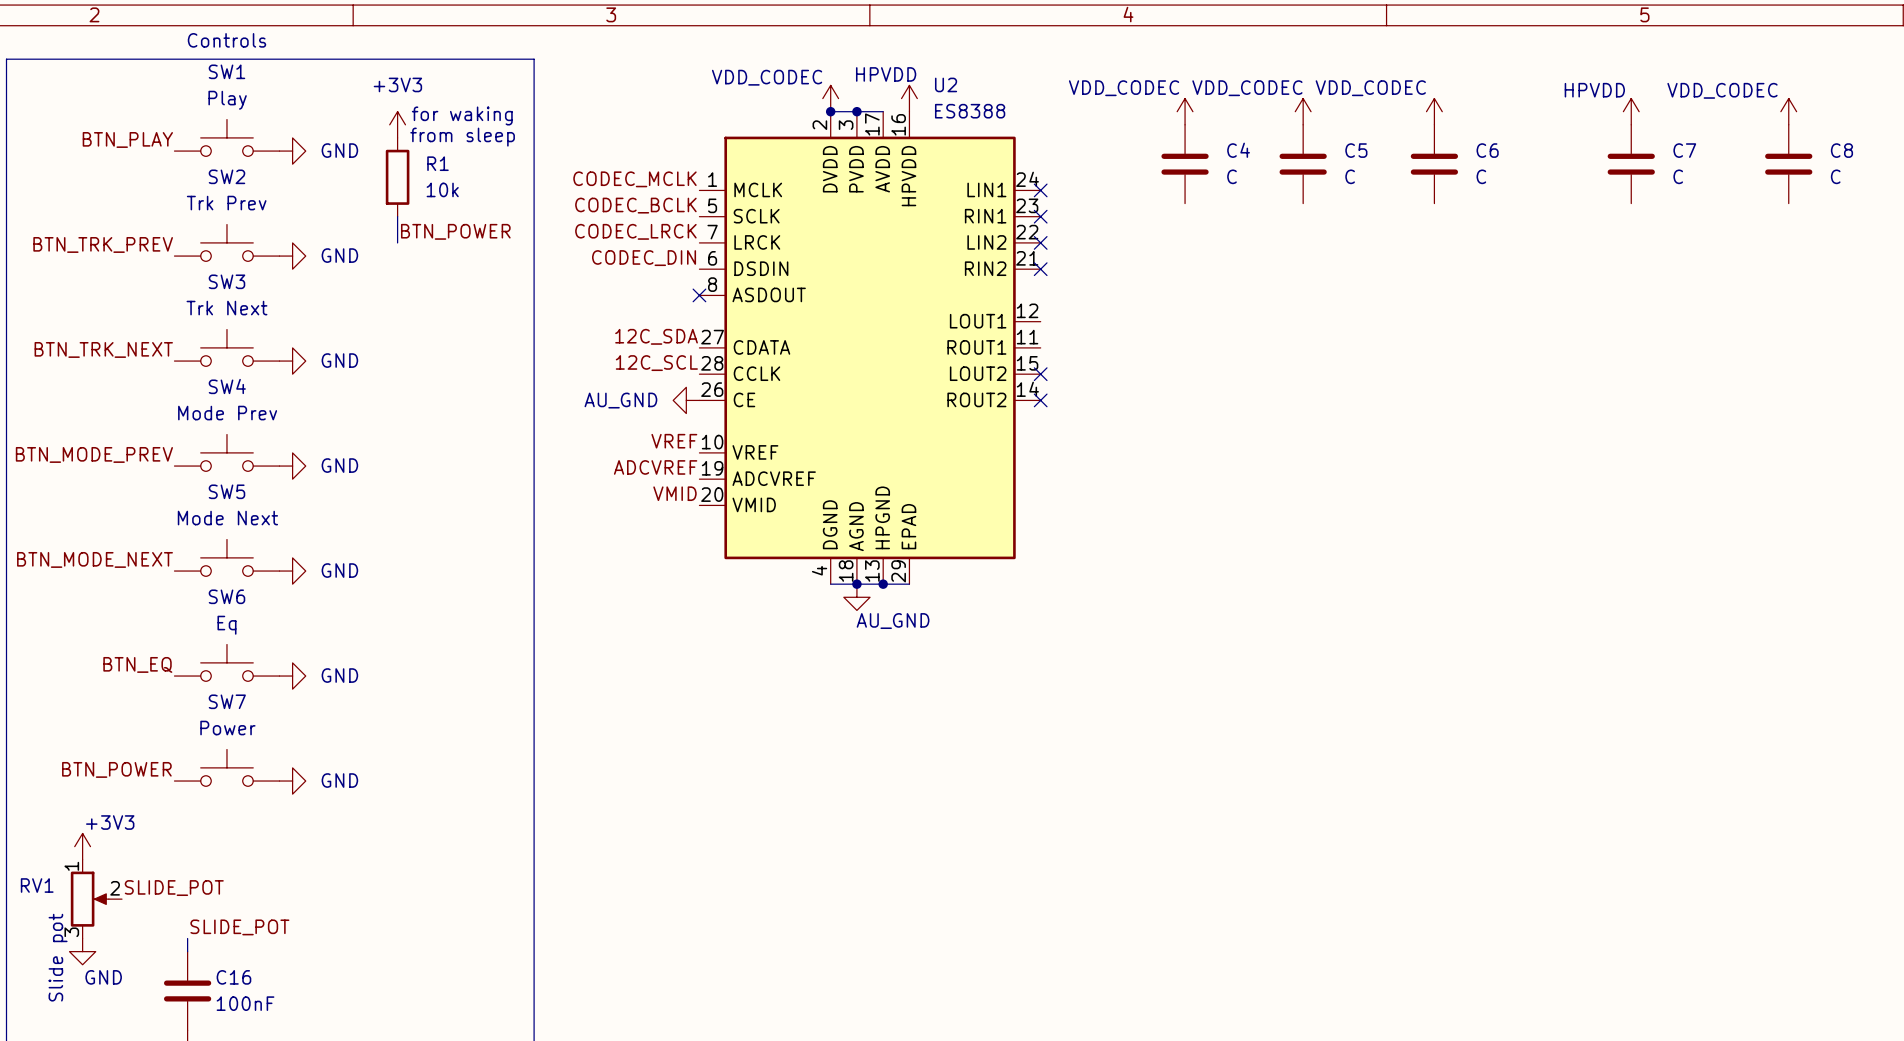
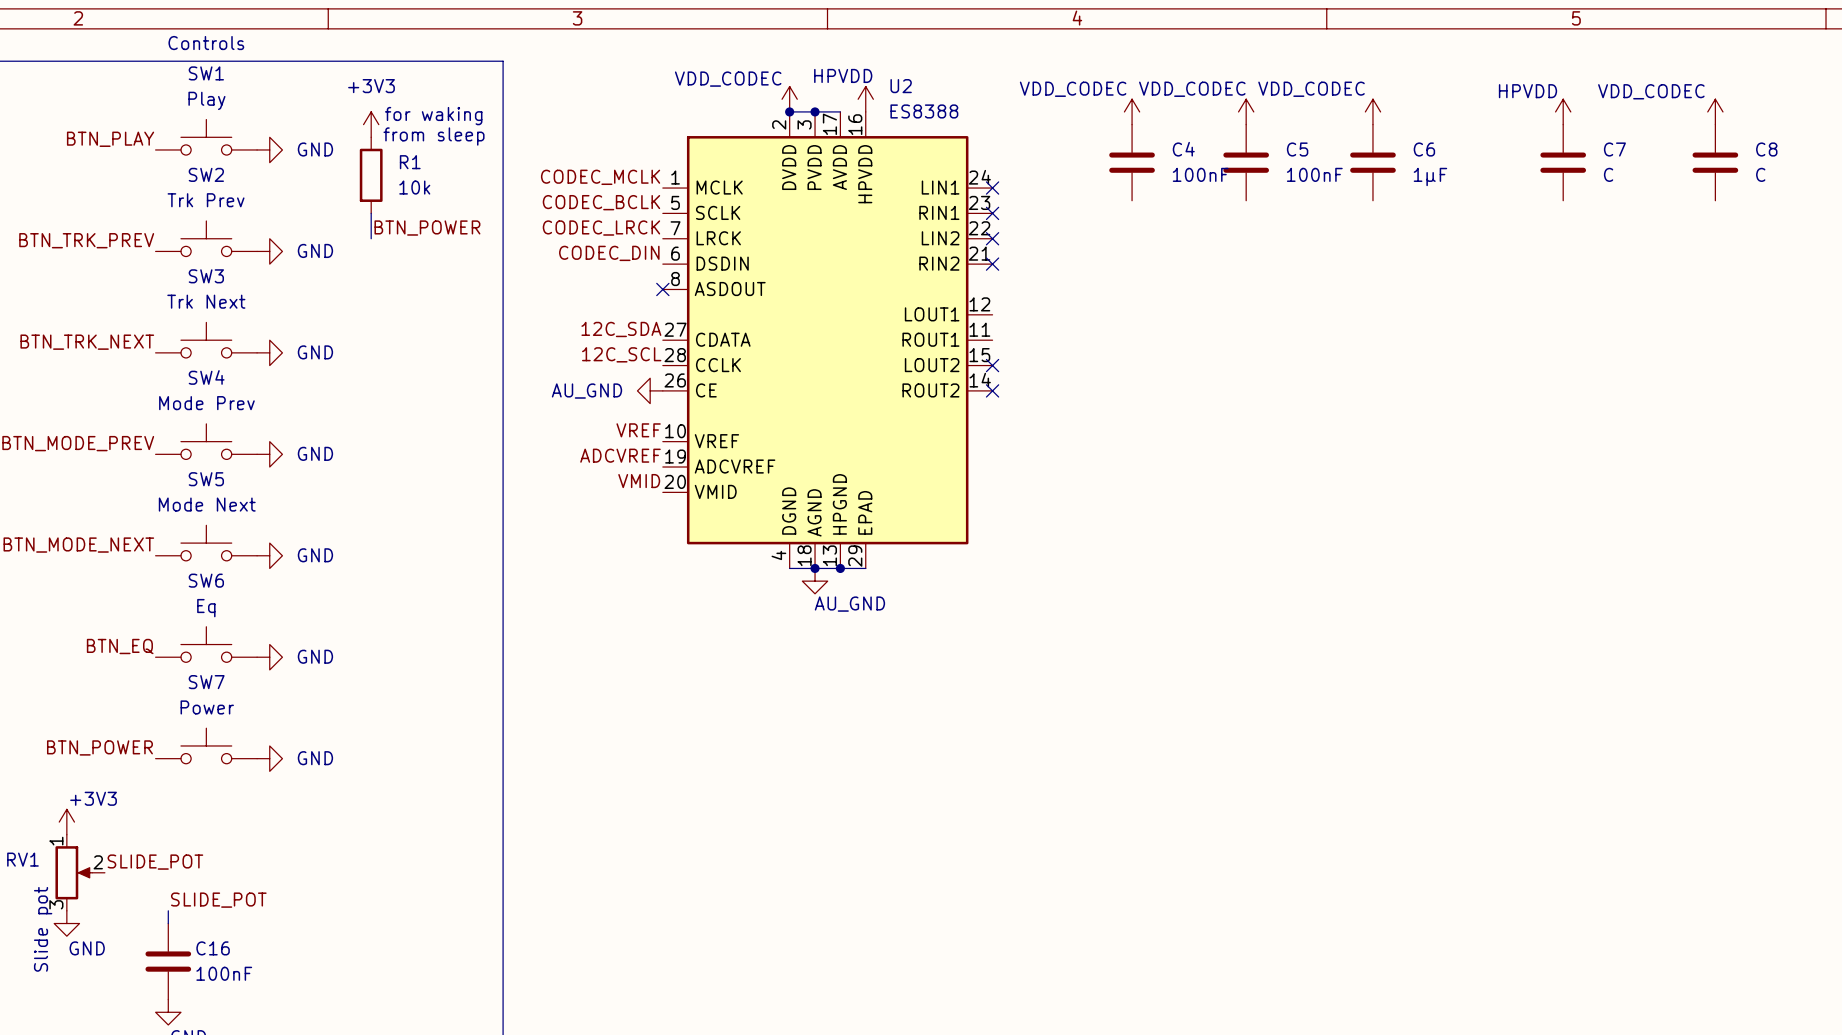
C4 value: C (1232, 176) -> 100nF (1200, 174)
C5 value: C (1350, 176) -> 100nF (1314, 174)
C6 value: C (1481, 176) -> 1μF (1430, 176)

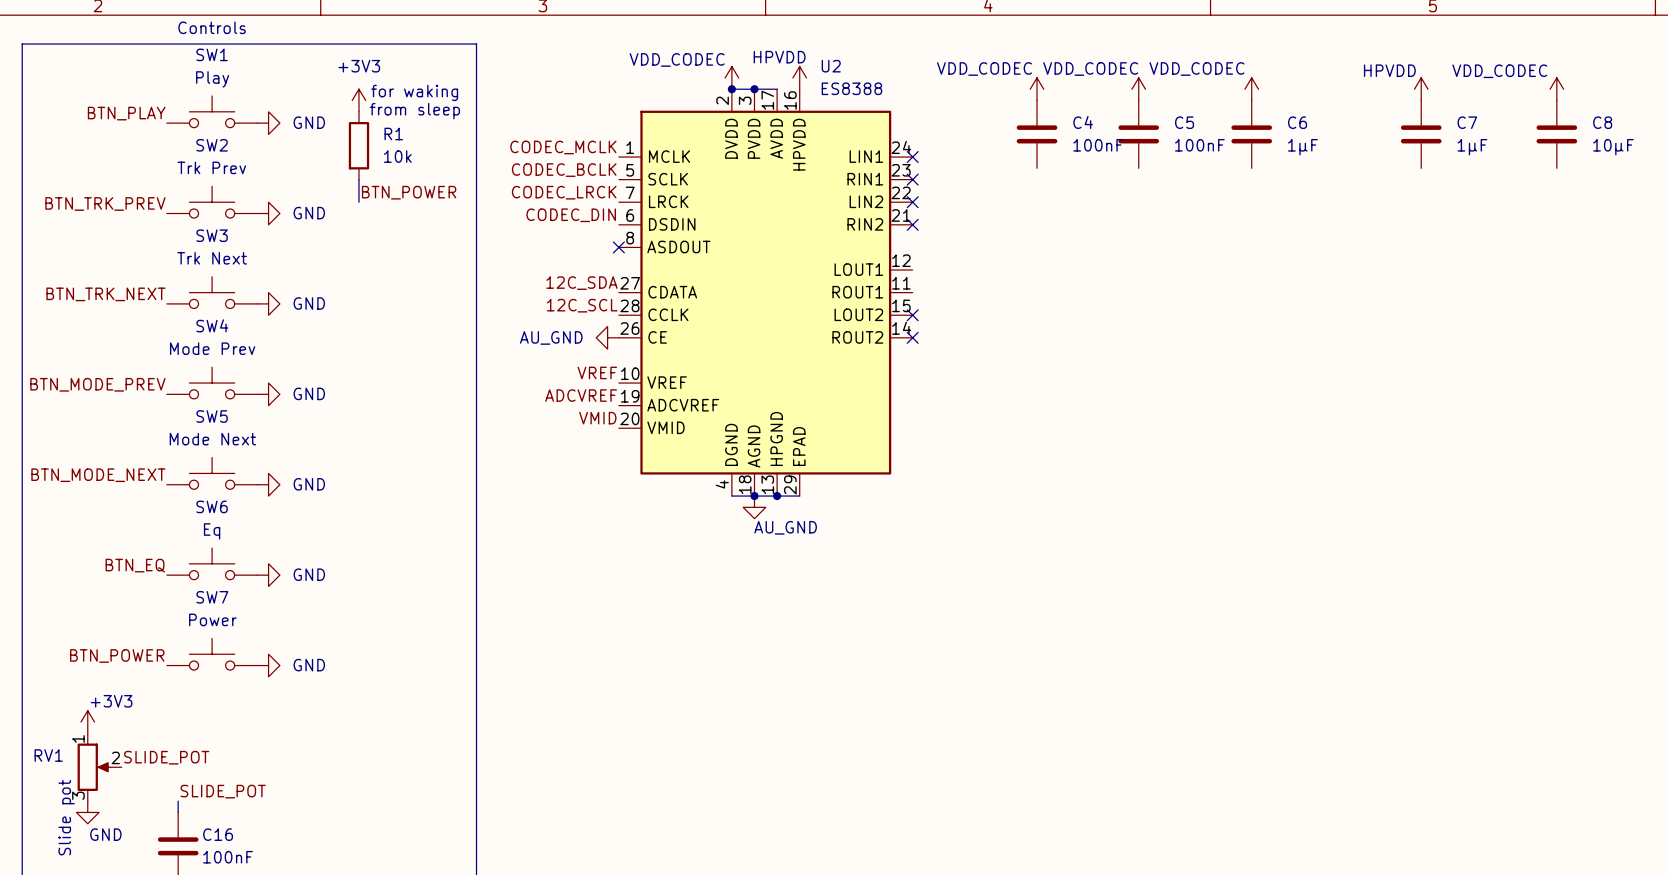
C7 value: C (1608, 174) -> 1μF (1472, 147)
C8 value: C (1760, 174) -> 10μF (1613, 147)

